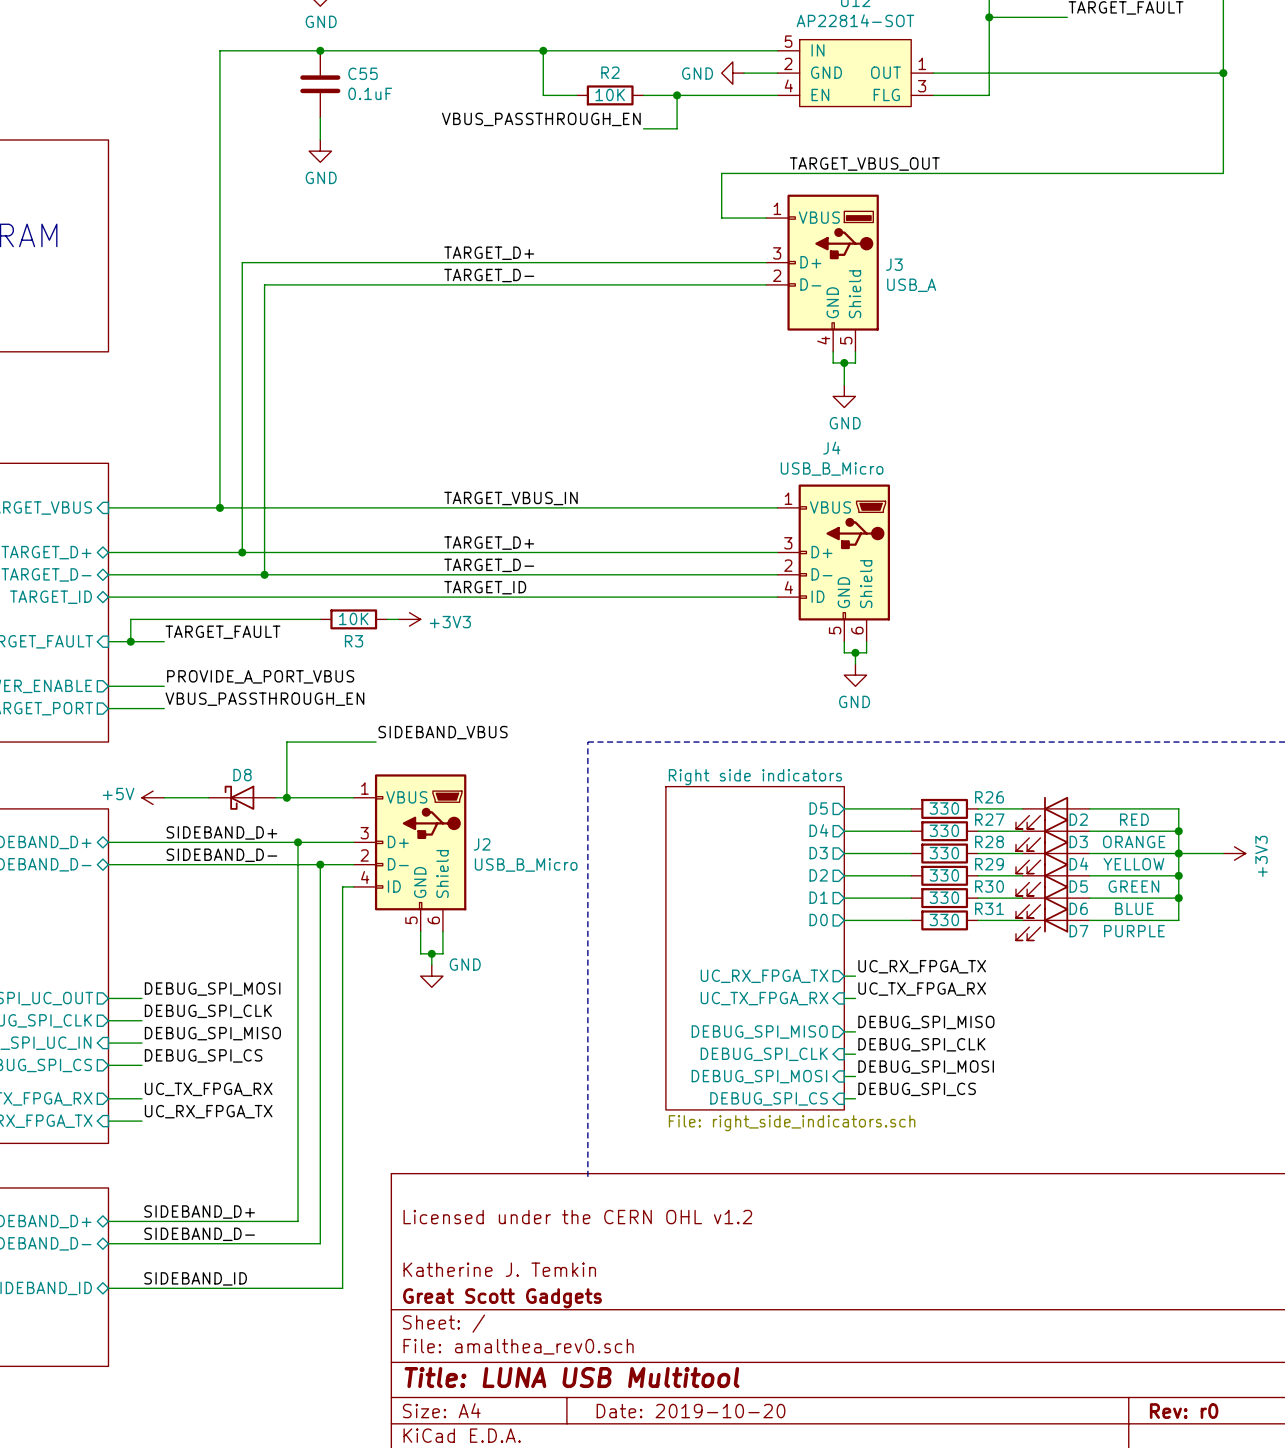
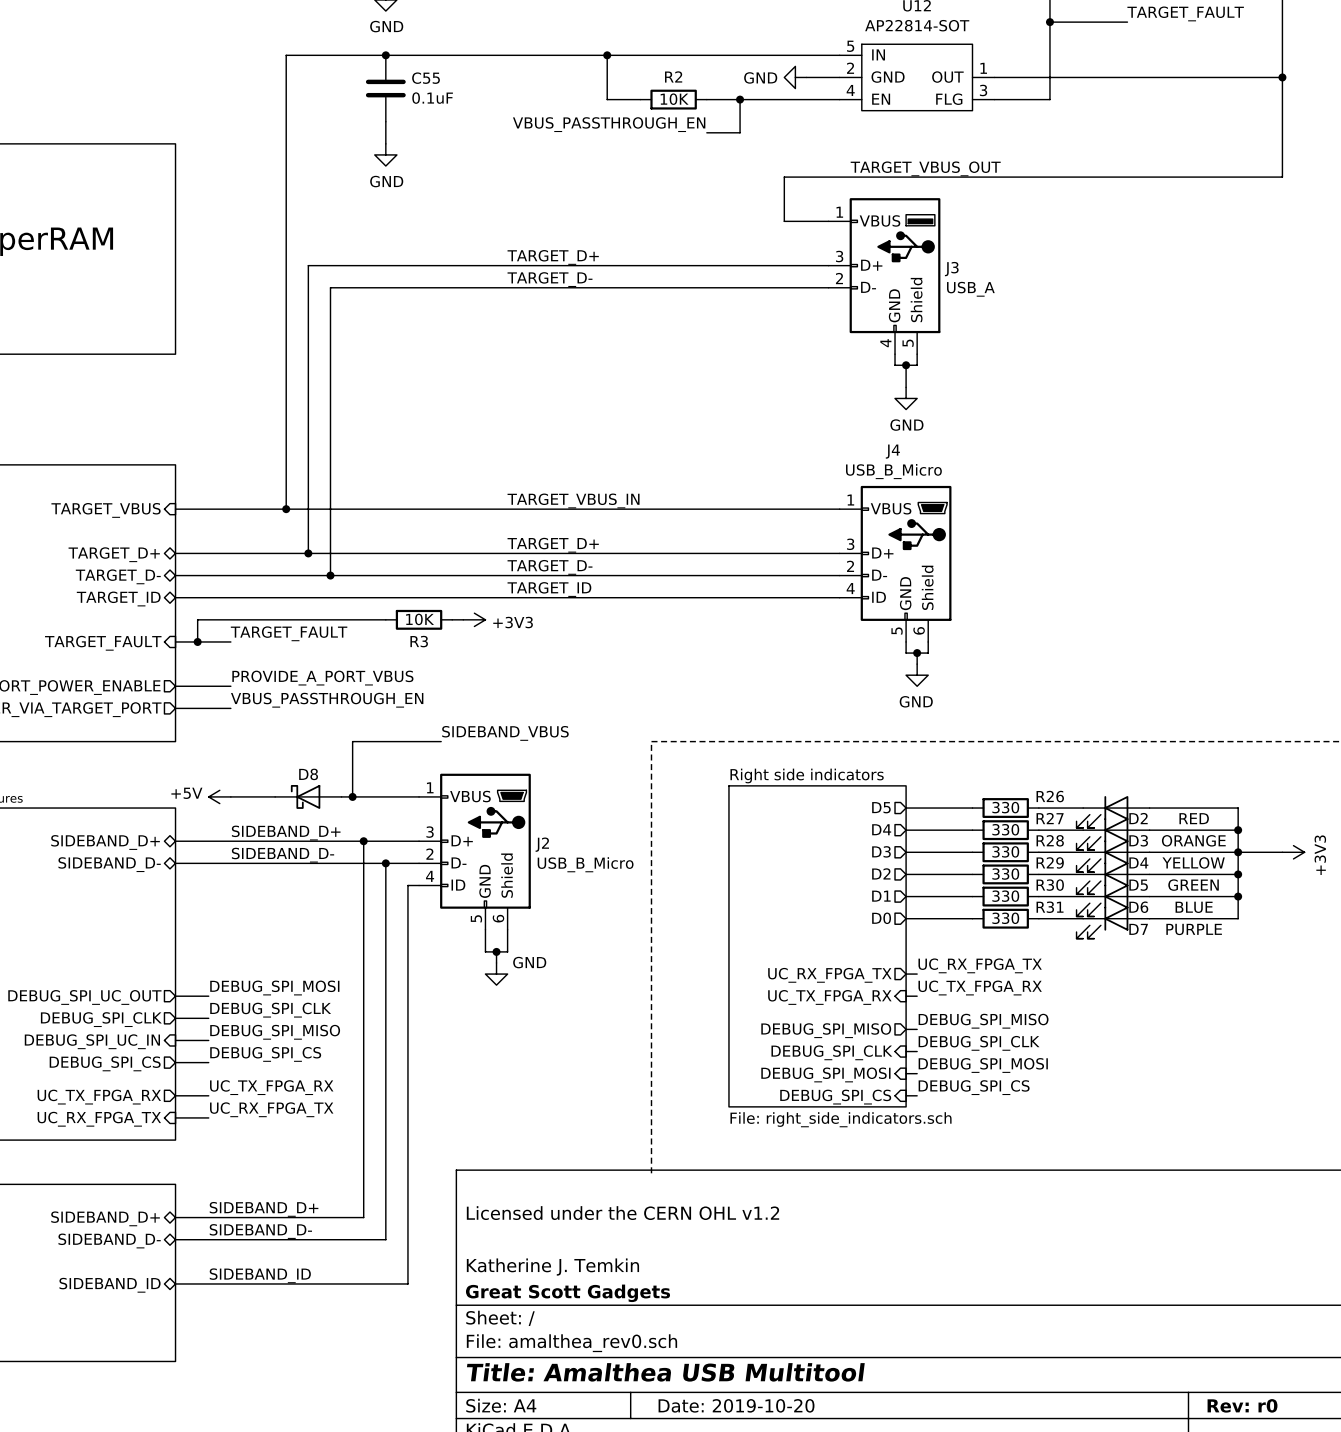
title block: Title: LUNA USB Multitool (572, 1377) -> Title: Amalthea USB Multitool (665, 1372)

